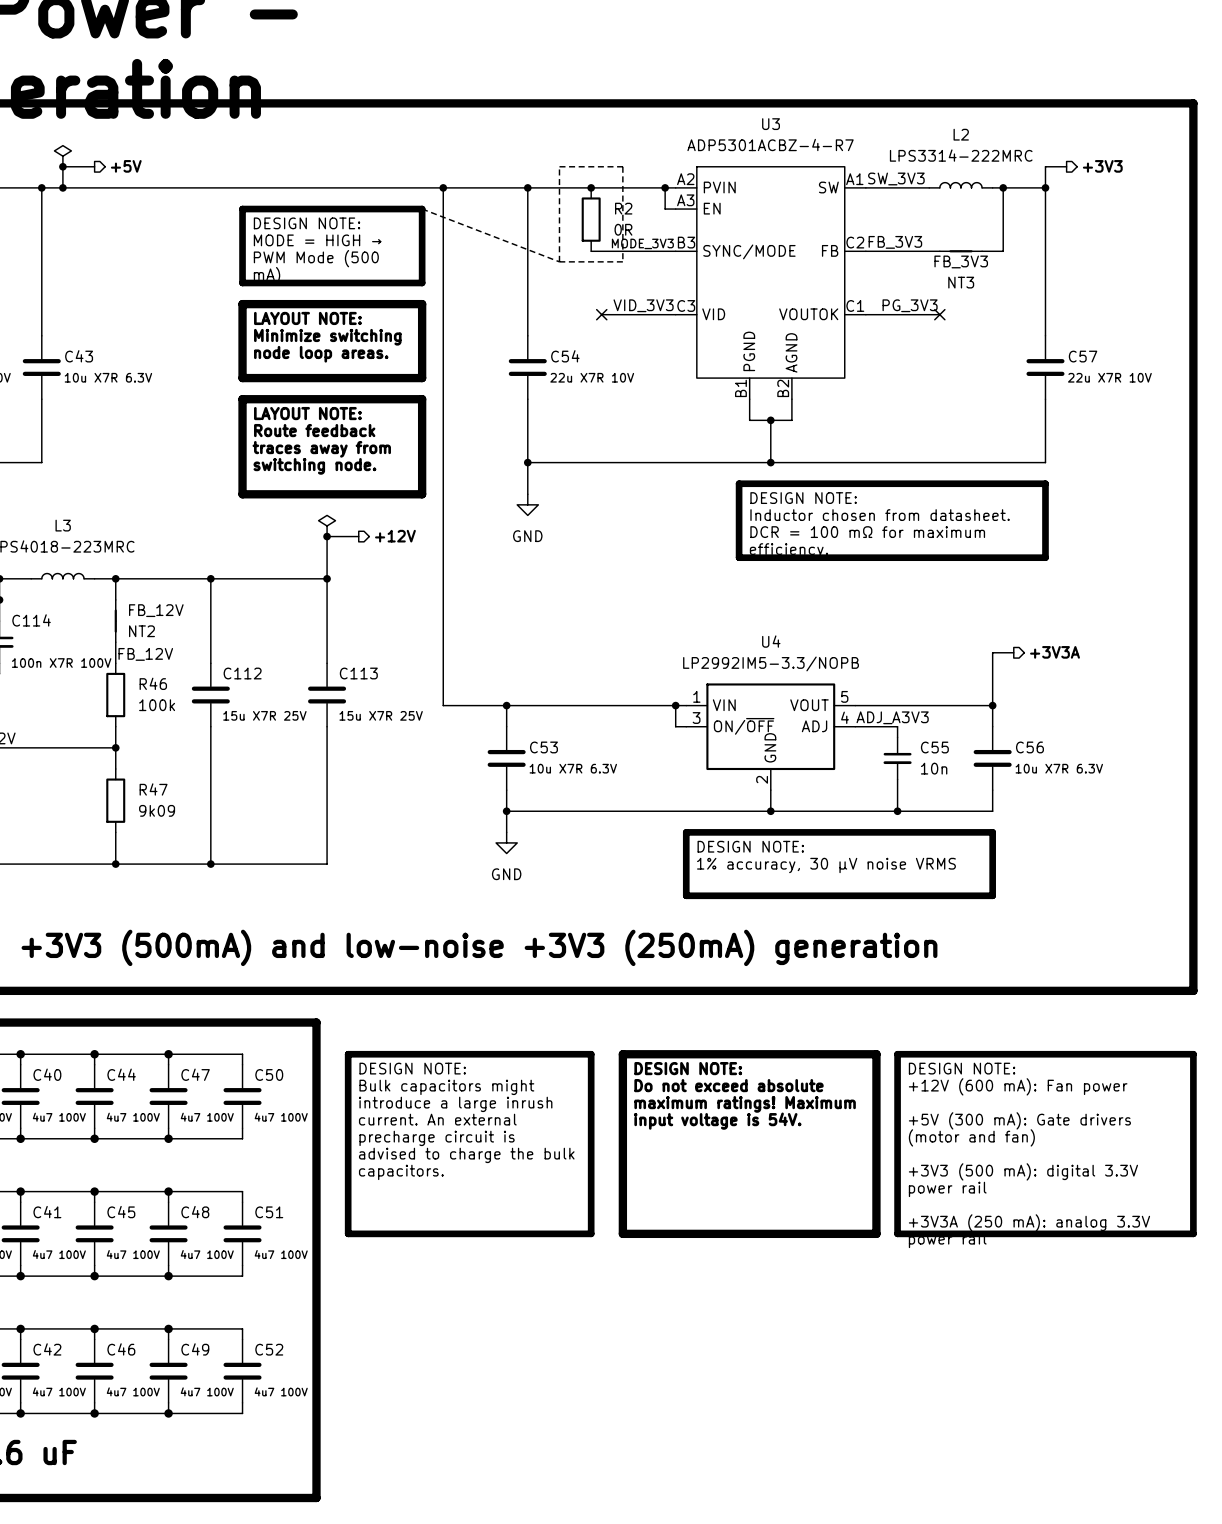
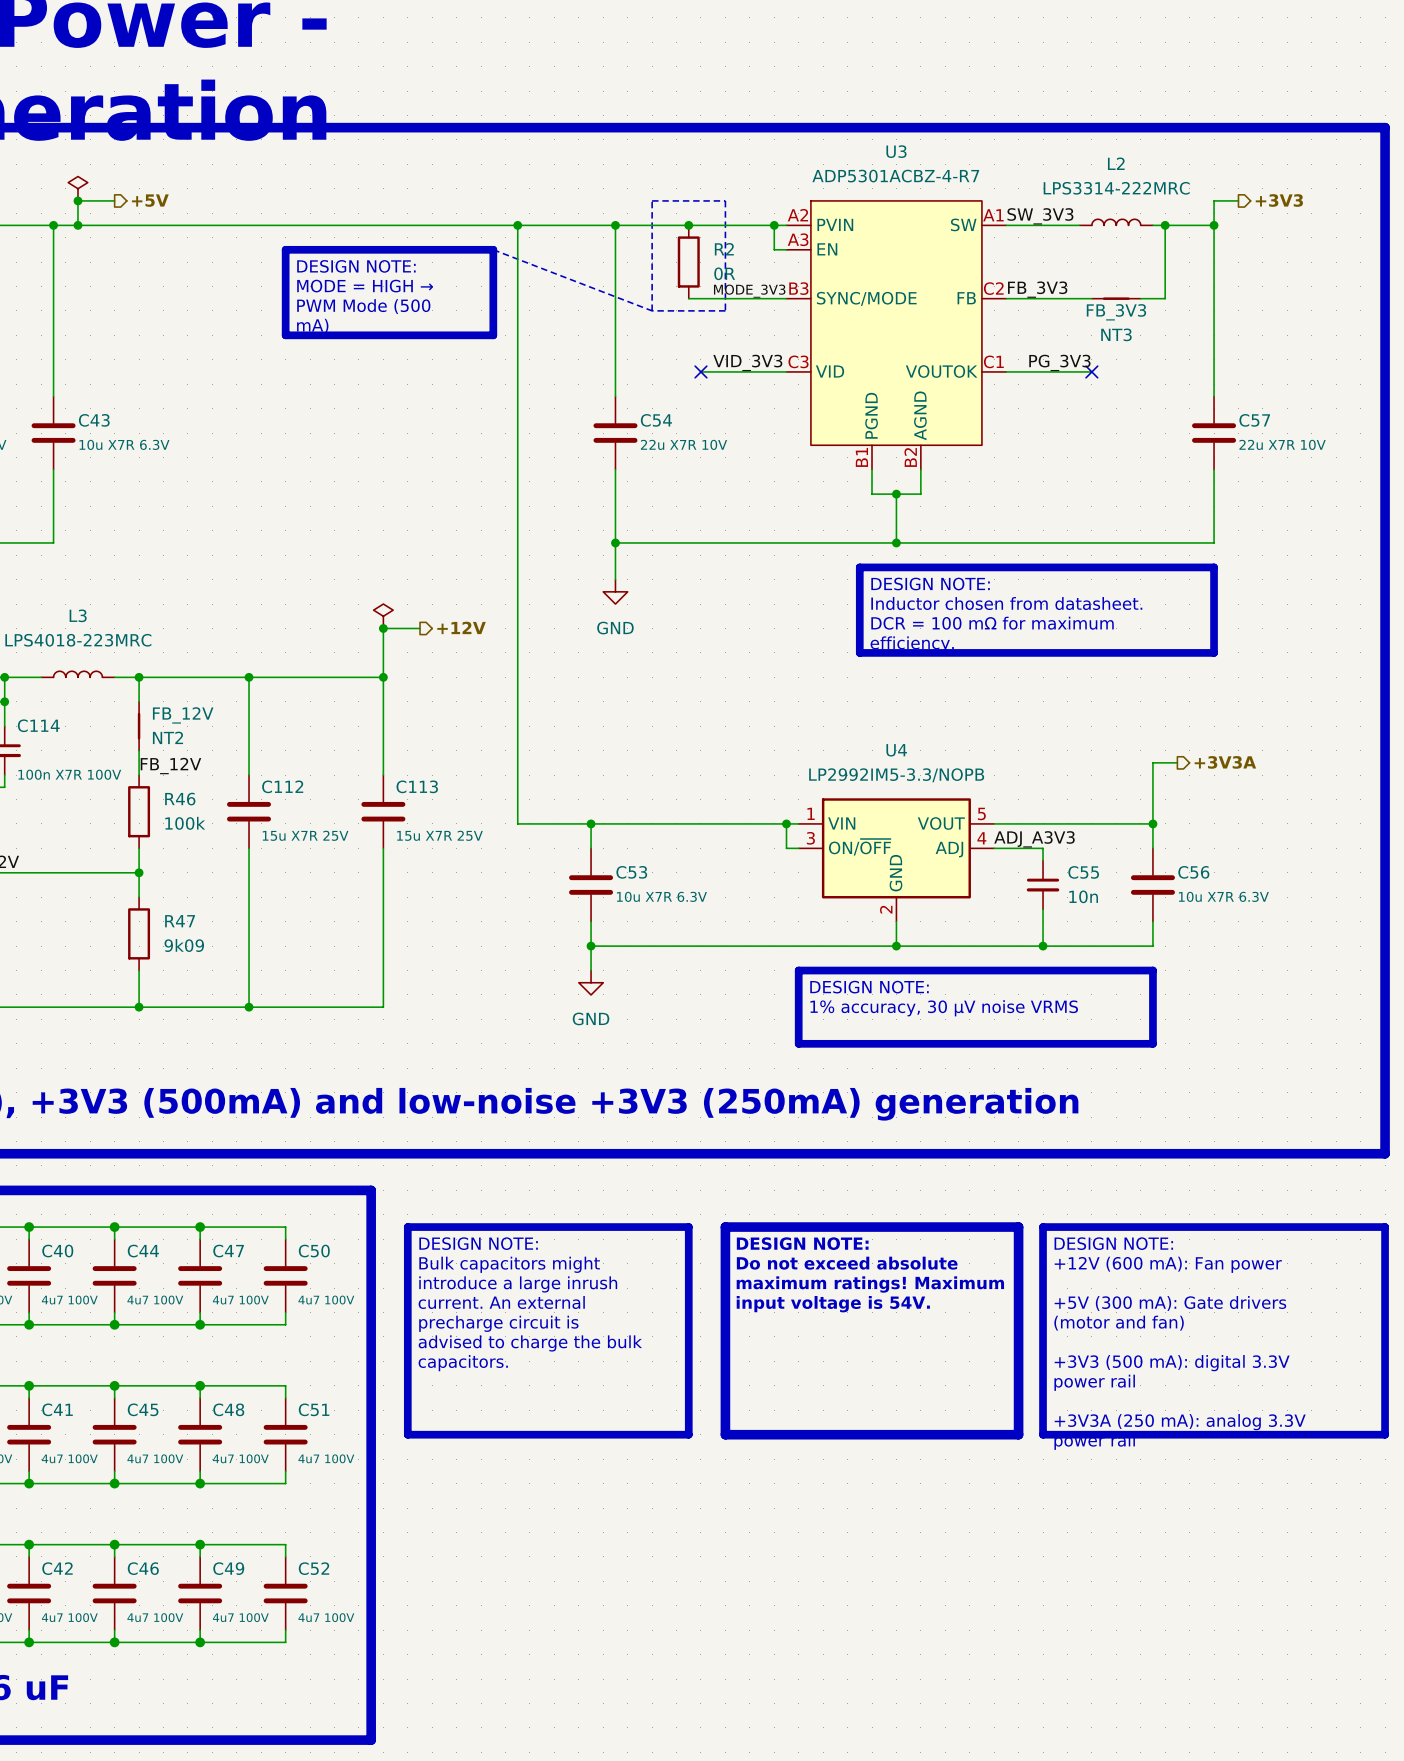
line: (242, 304) (242, 378) (422, 378) (422, 304) (242, 304) -> none
text: LAYOUT NOTE: (307, 318) -> none
text: Minimize switching (327, 337) -> none
text: node loop areas. (321, 354) -> none
line: (242, 399) (422, 399) (422, 494) (242, 494) (242, 399) -> none
text: LAYOUT NOTE: (307, 413) -> none
text: Route feedback (314, 430) -> none
text: traces away from (321, 449) -> none
text: switching node. (314, 466) -> none

